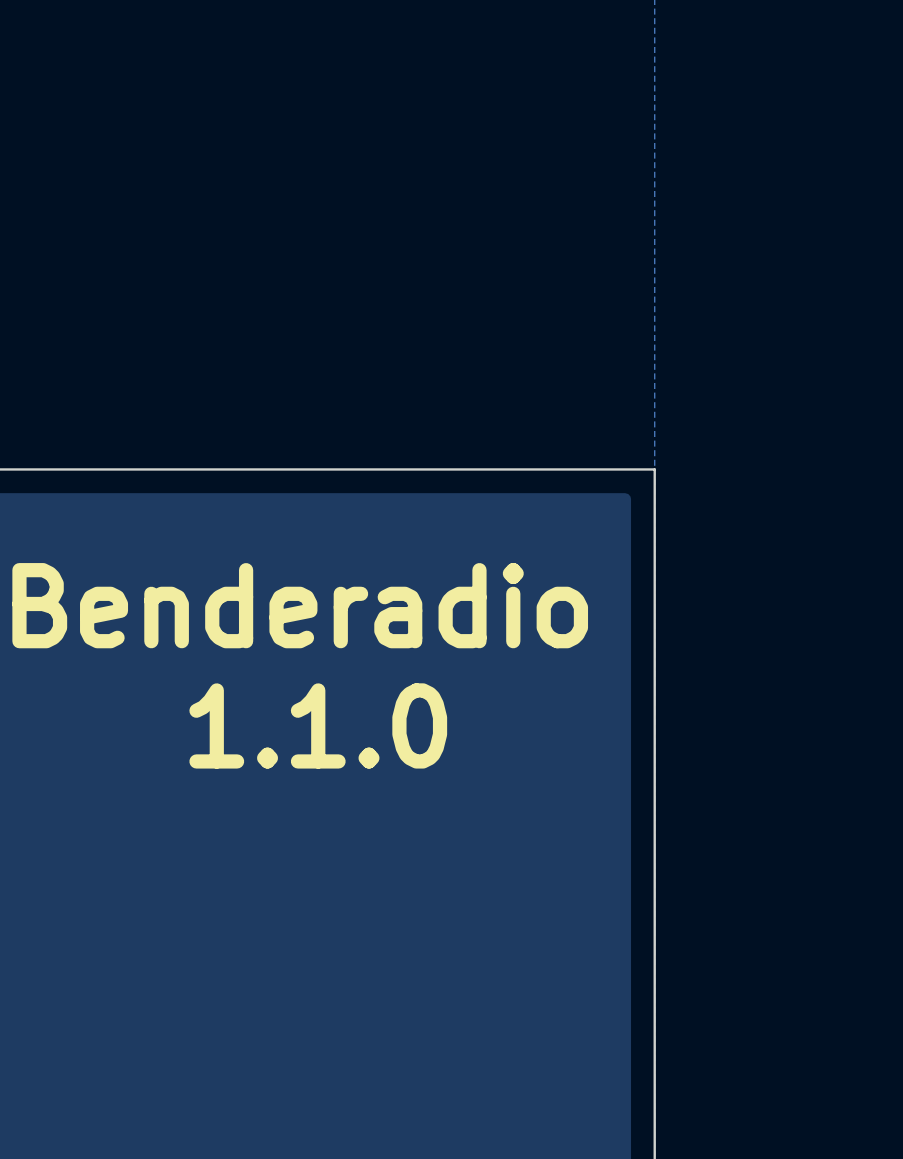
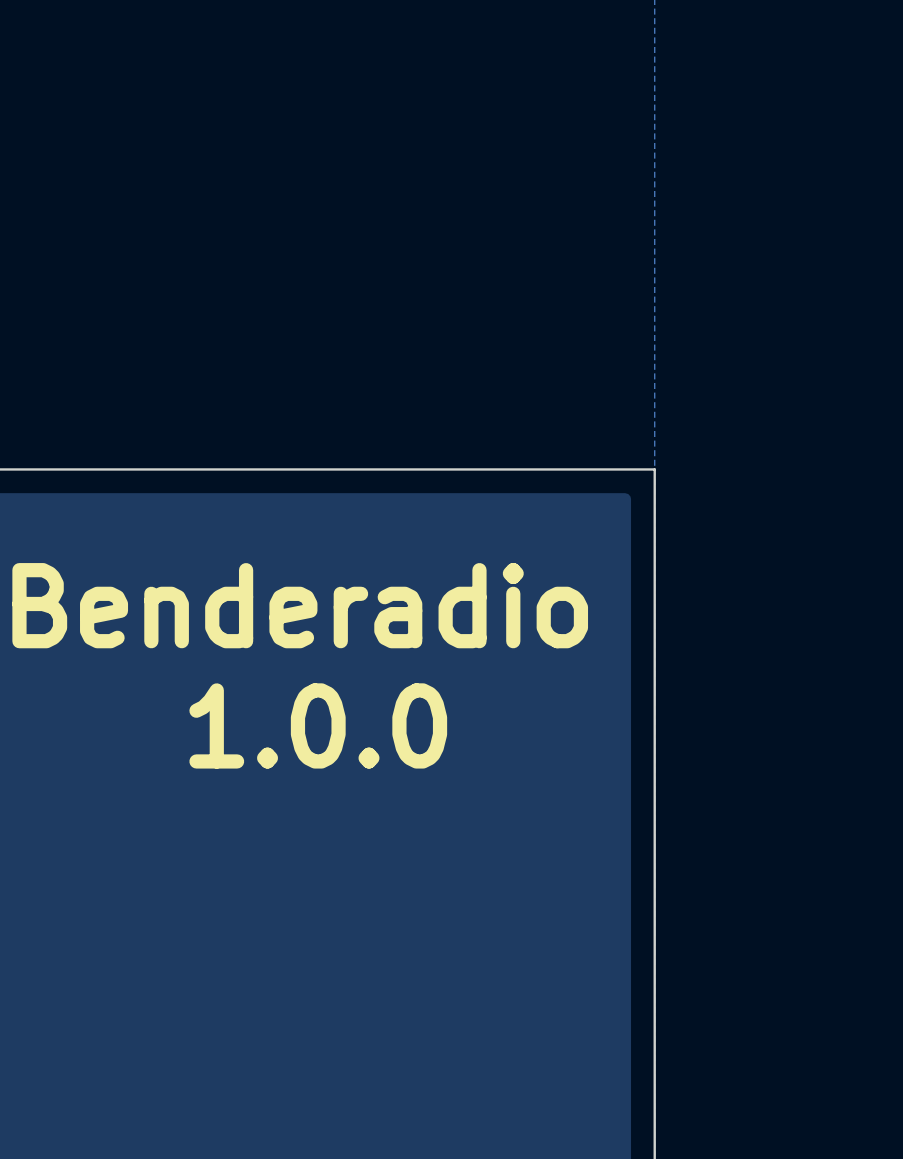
text: 1.1.0 (318, 725) -> 1.0.0 (318, 725)

